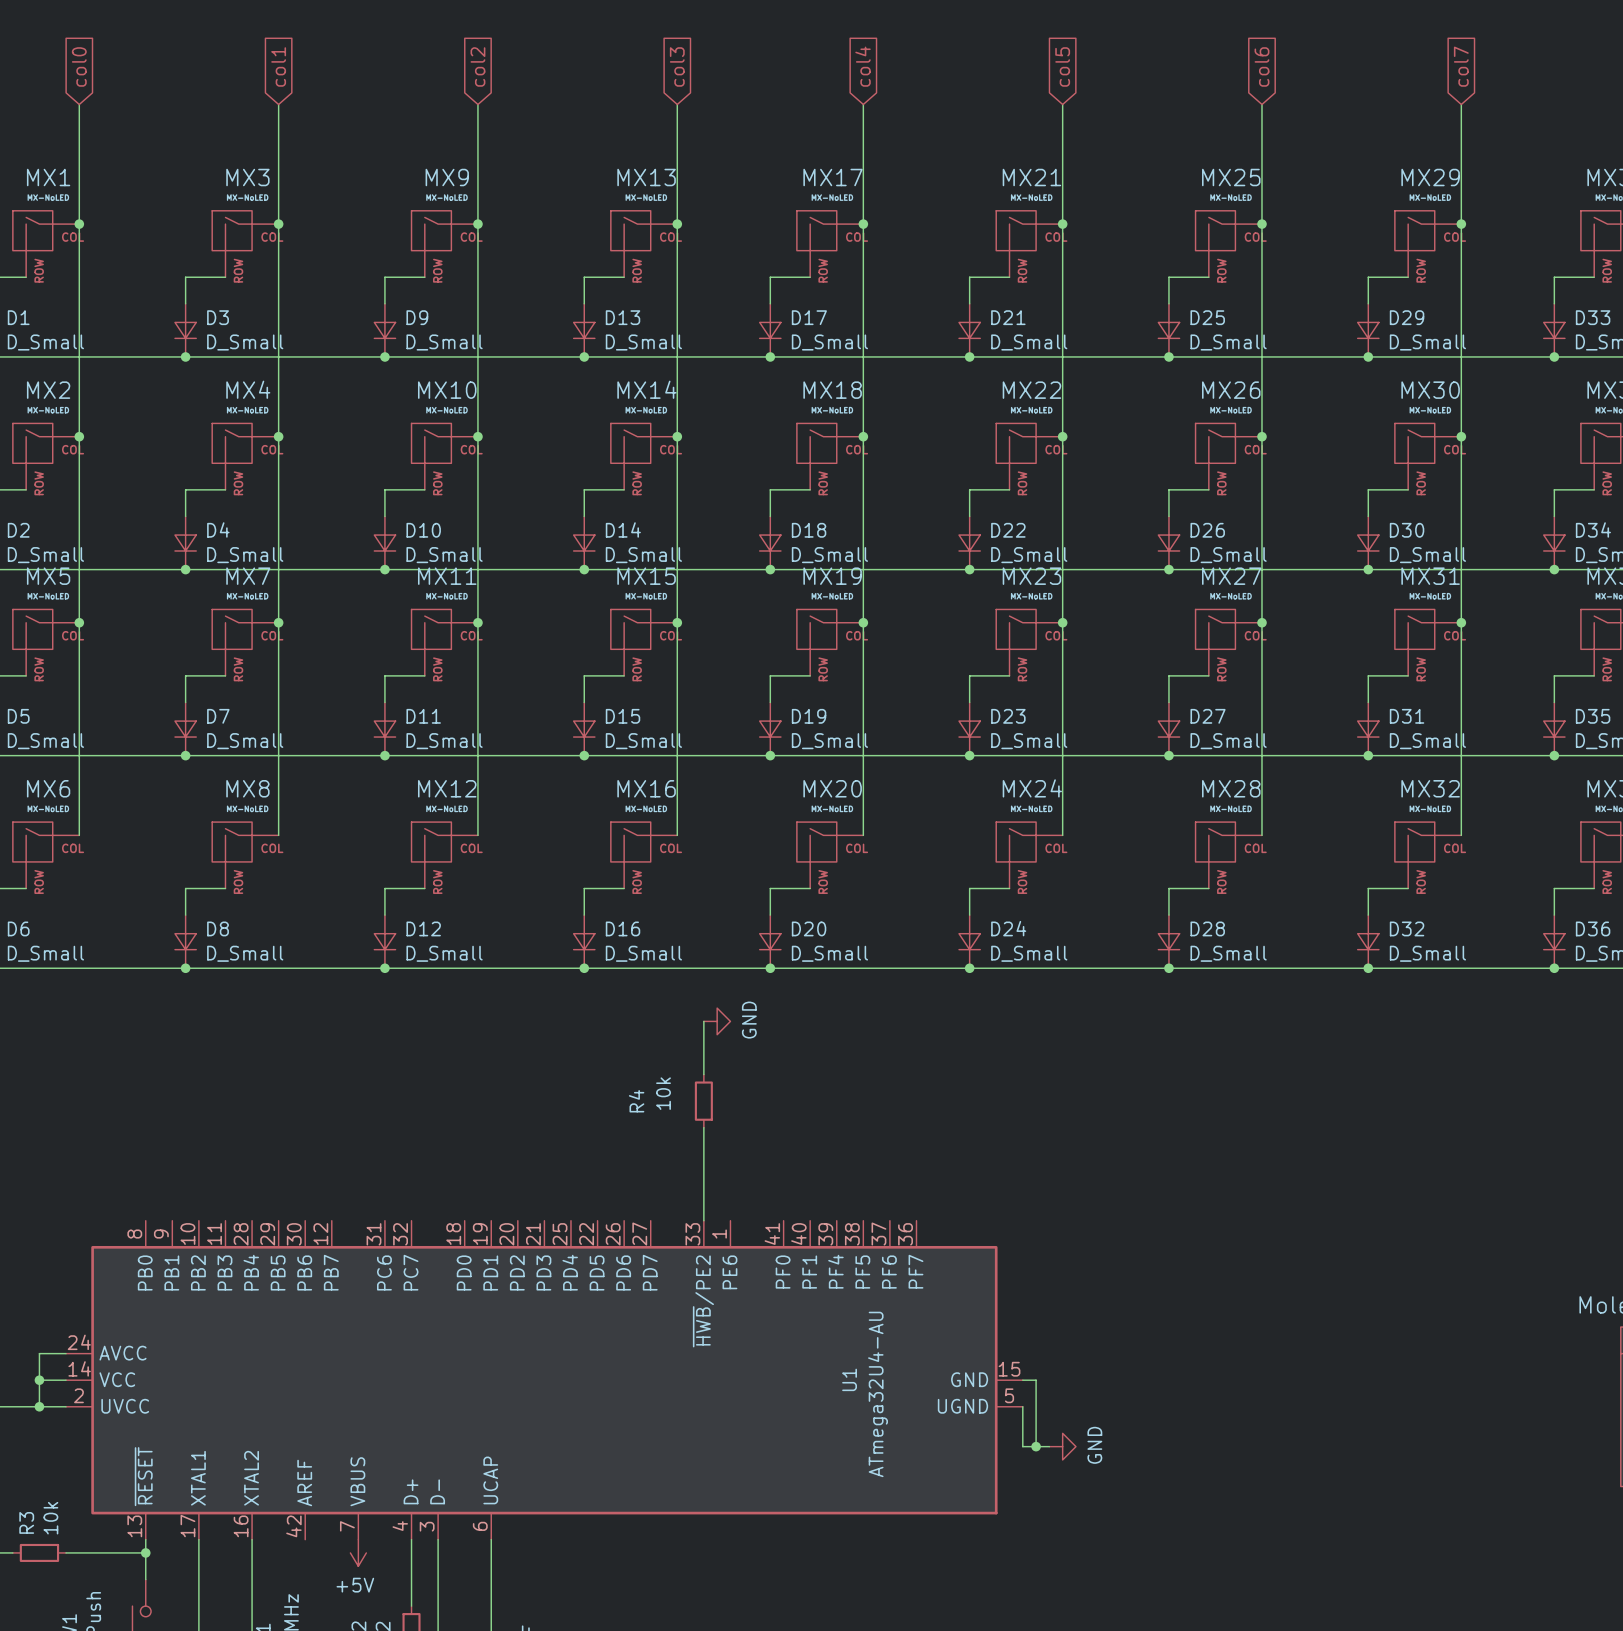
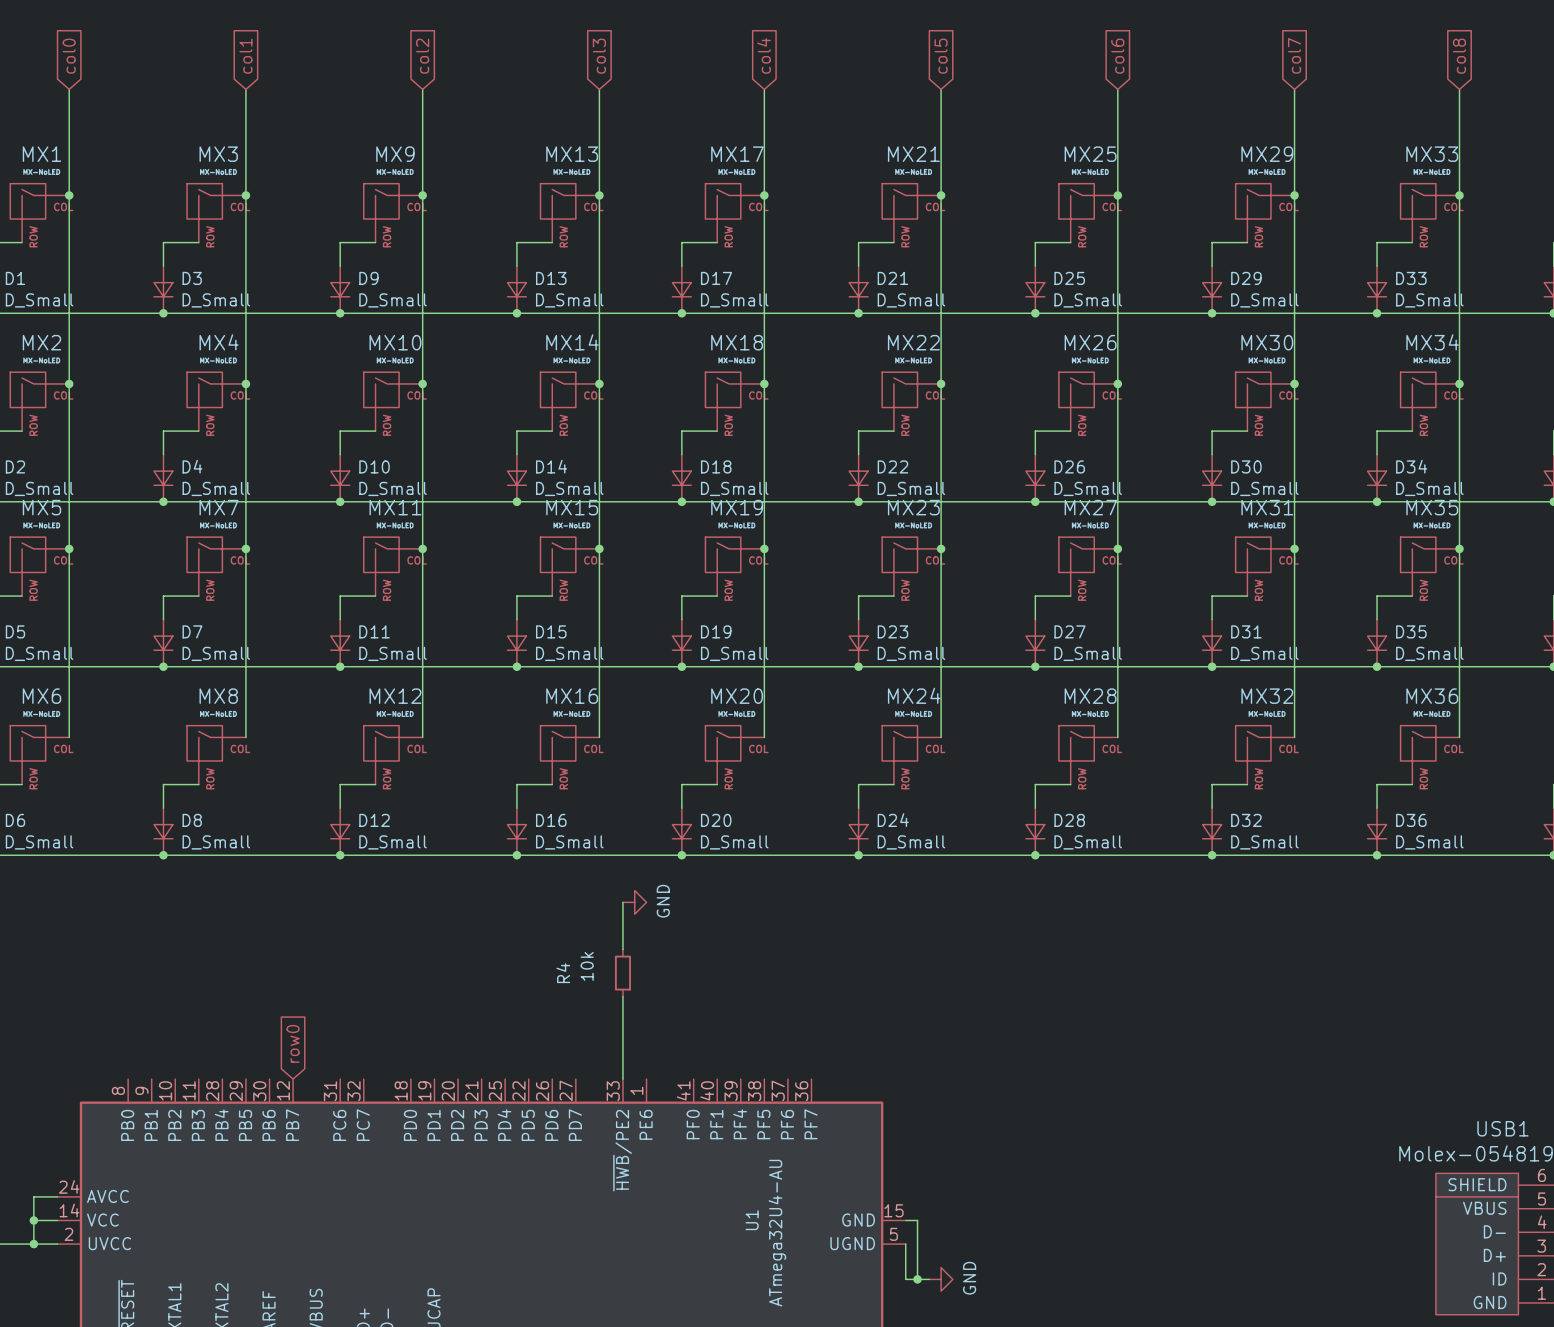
global label: none -> row0 (293, 1043)

